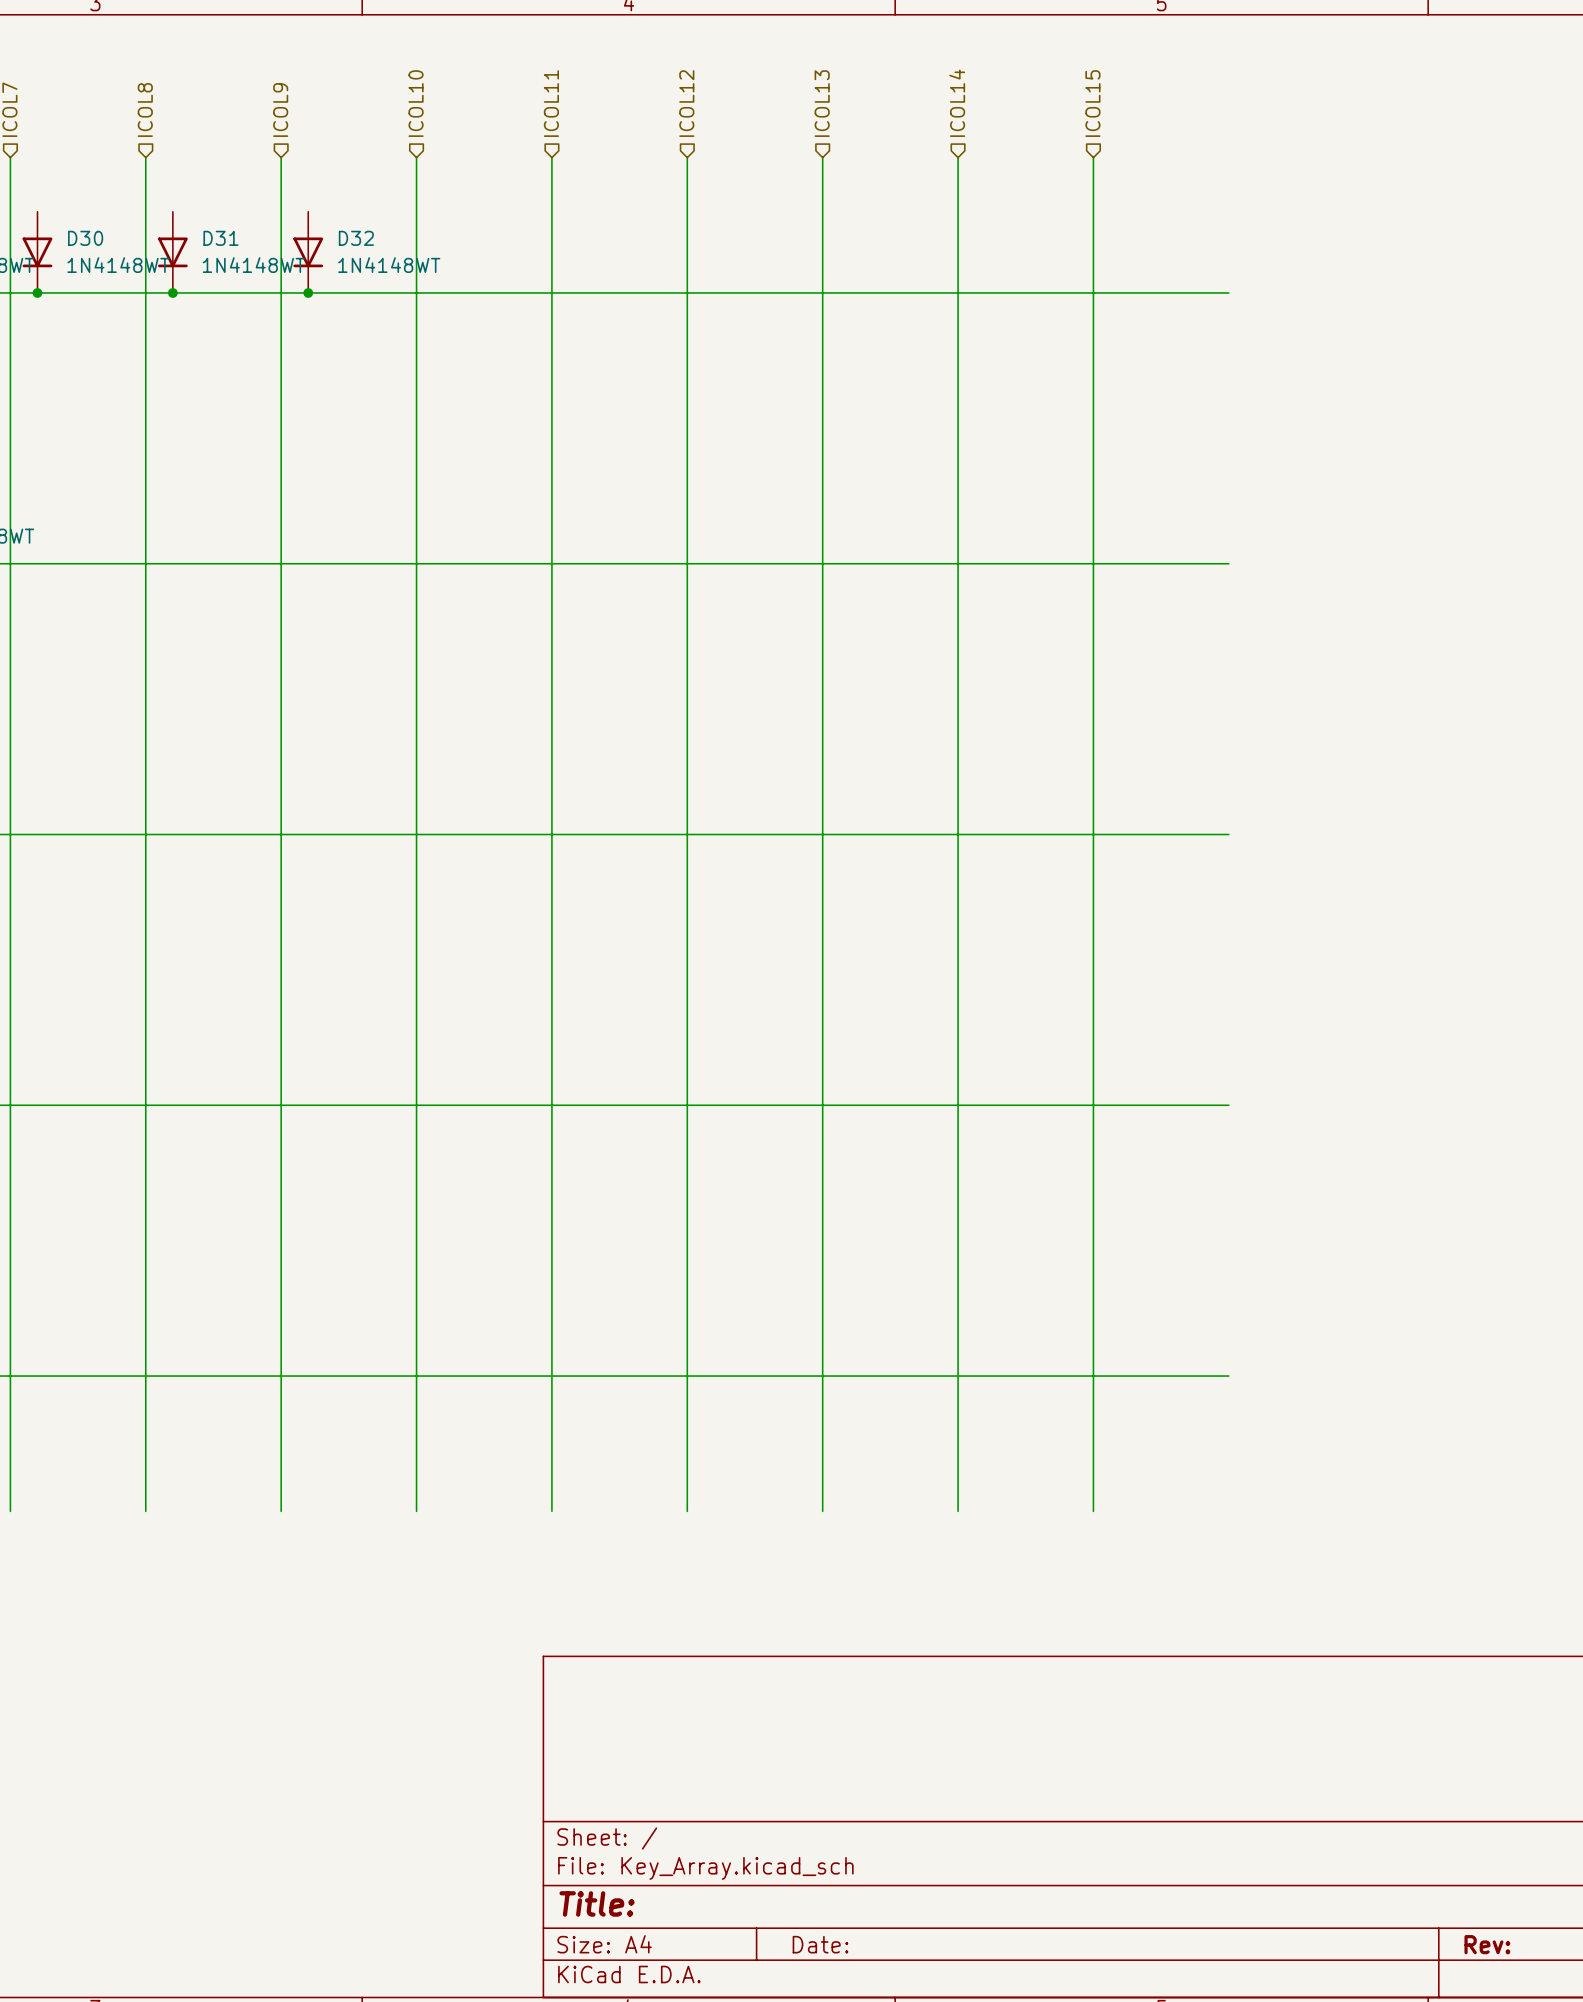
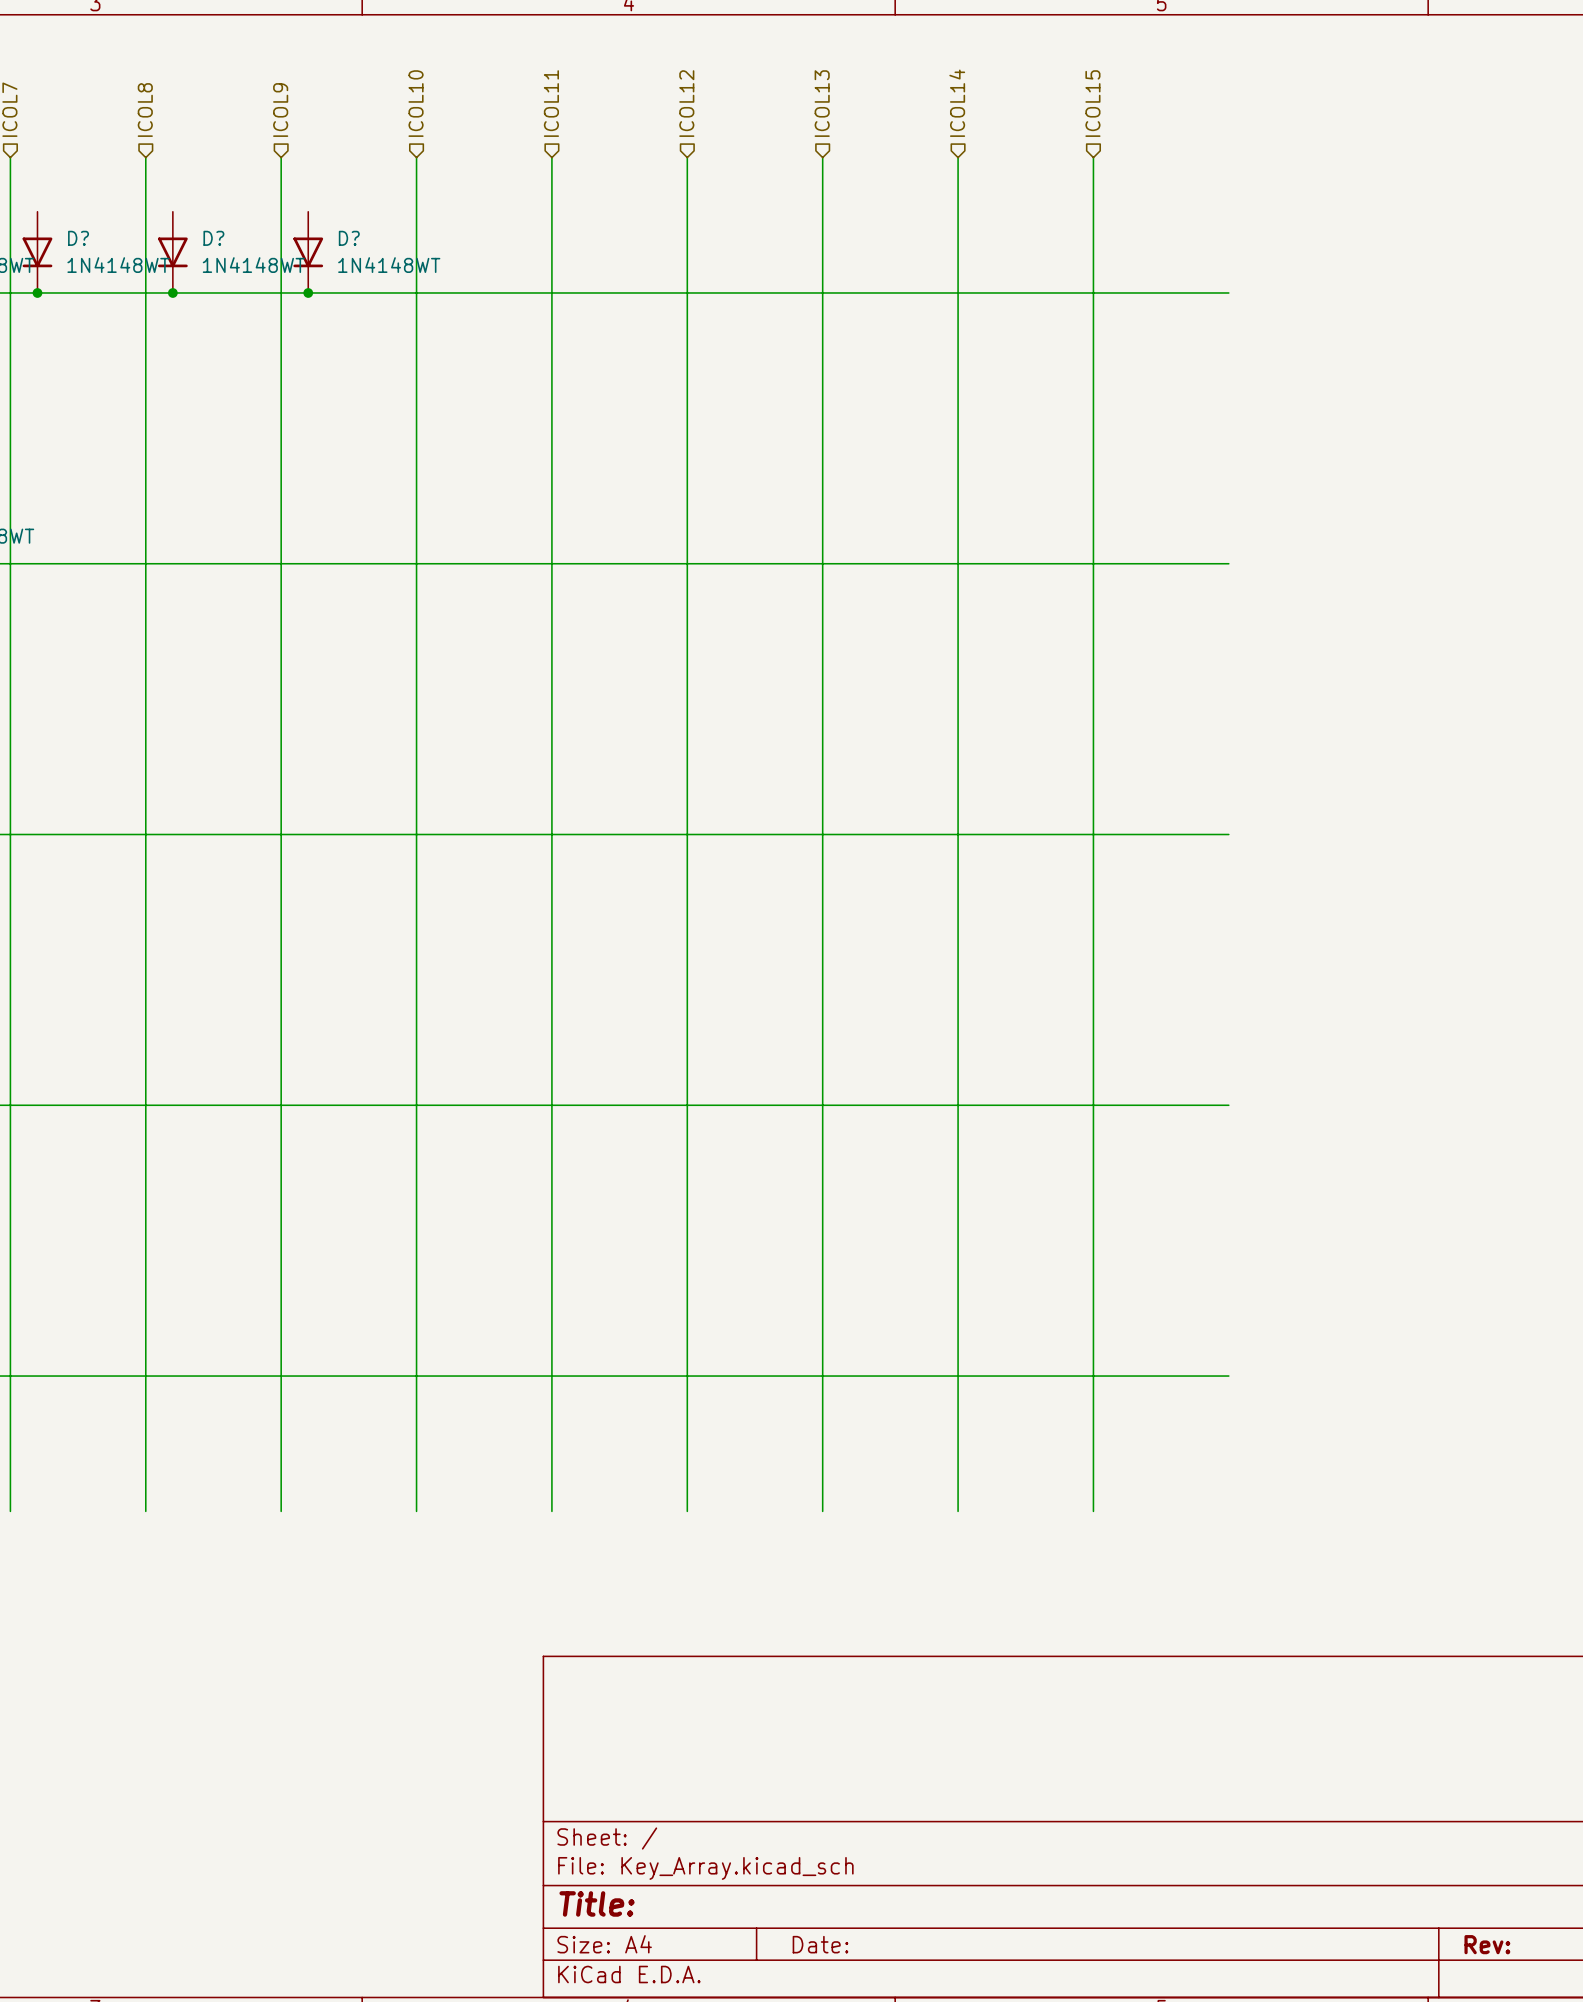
D30 name: D30 (85, 238) -> D? (78, 238)
D31 name: D31 (220, 238) -> D? (213, 238)
D32 name: D32 (356, 238) -> D? (349, 238)

